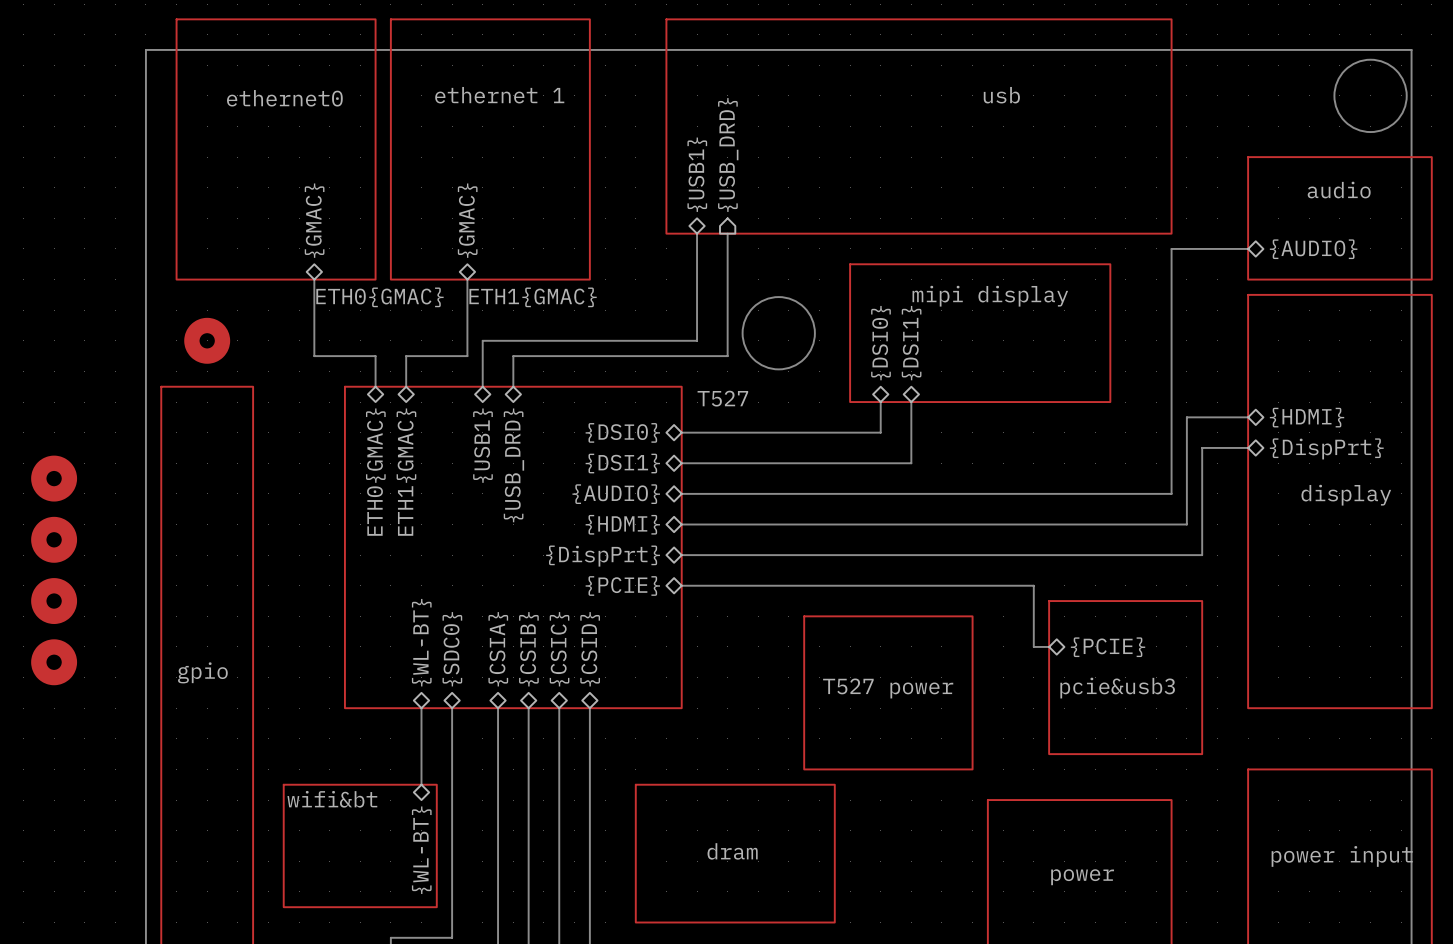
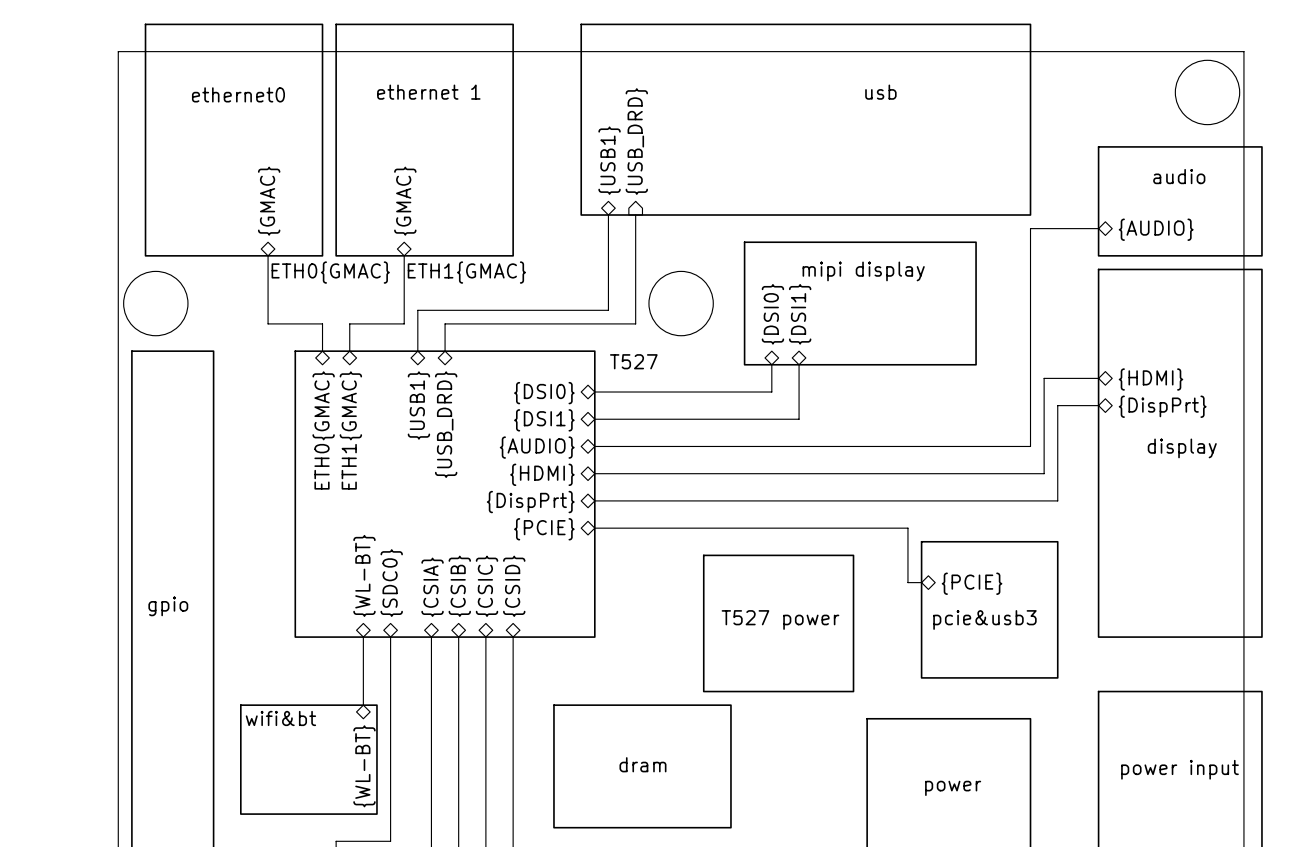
drawing: none -> [123, 271, 188, 336]
part: (207, 340) -> none
part: (54, 478) -> none
part: (54, 539) -> none
part: (54, 601) -> none
part: (54, 662) -> none

